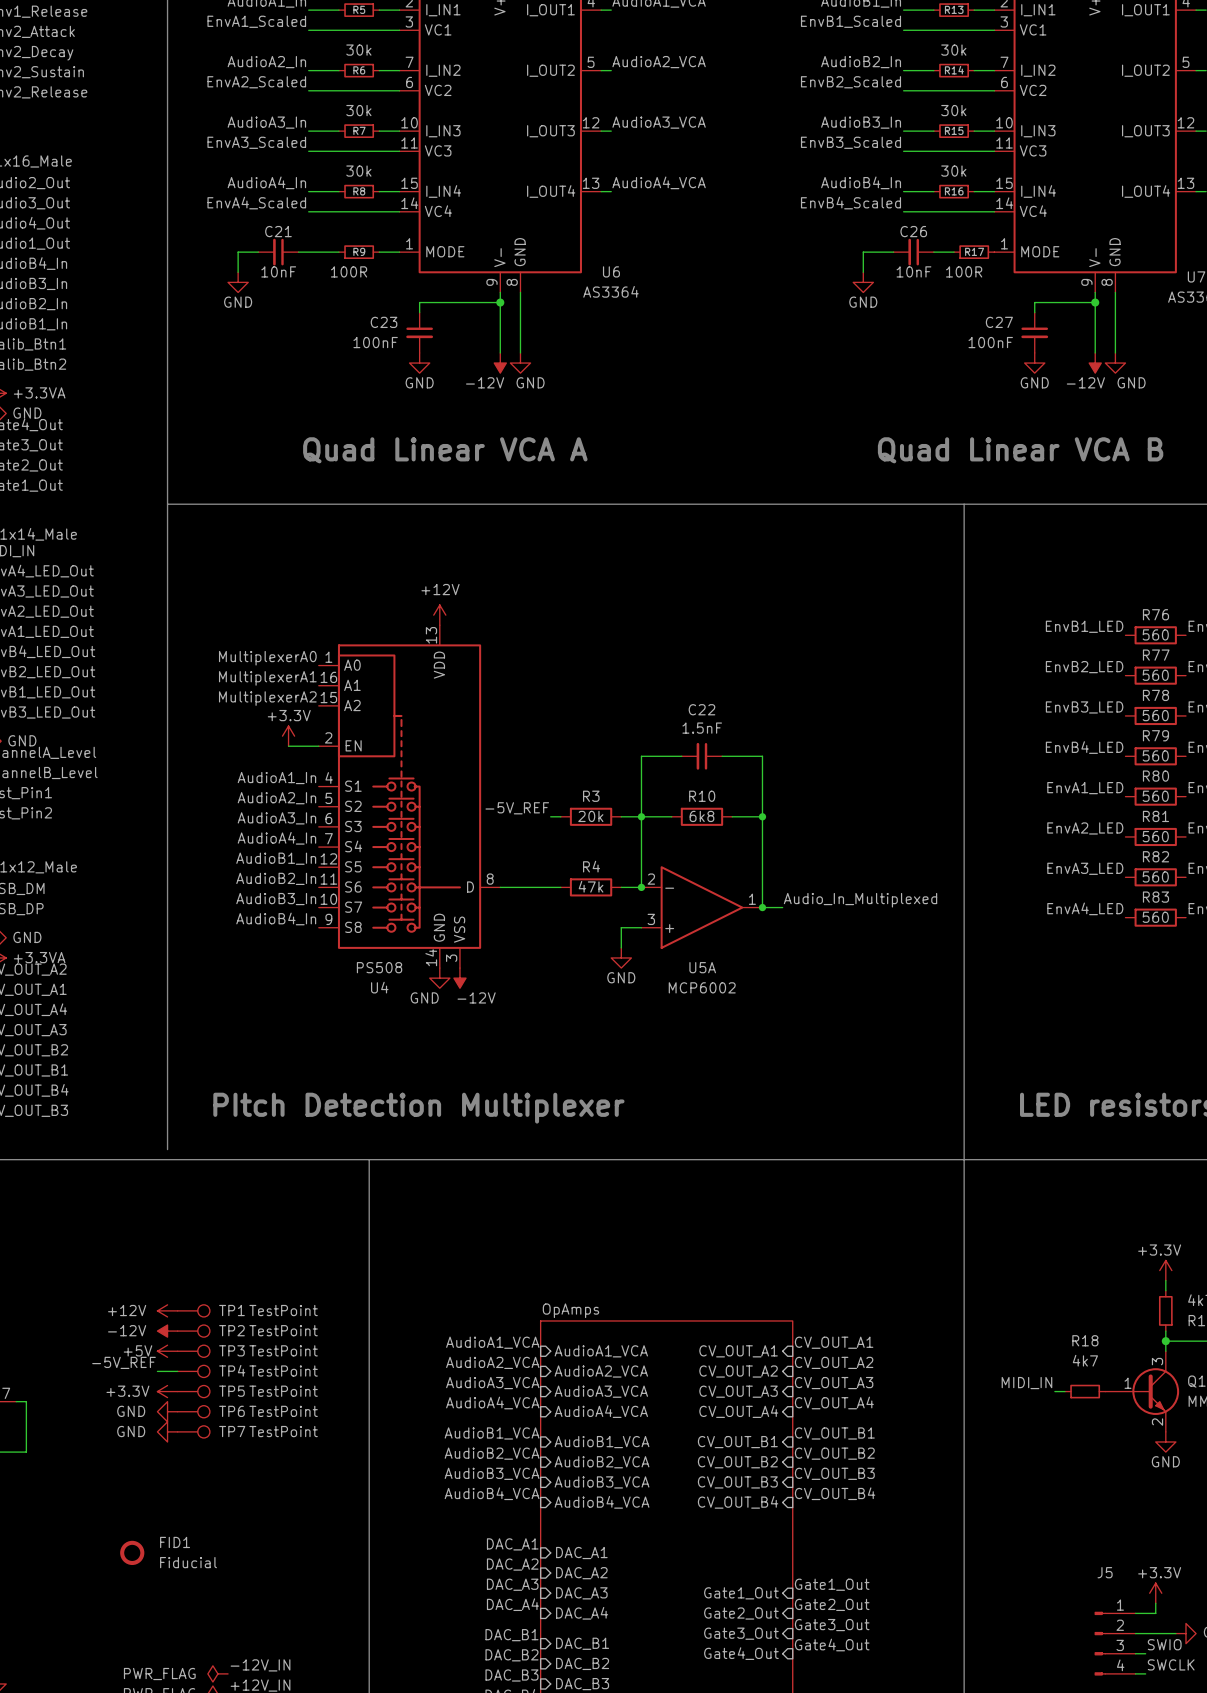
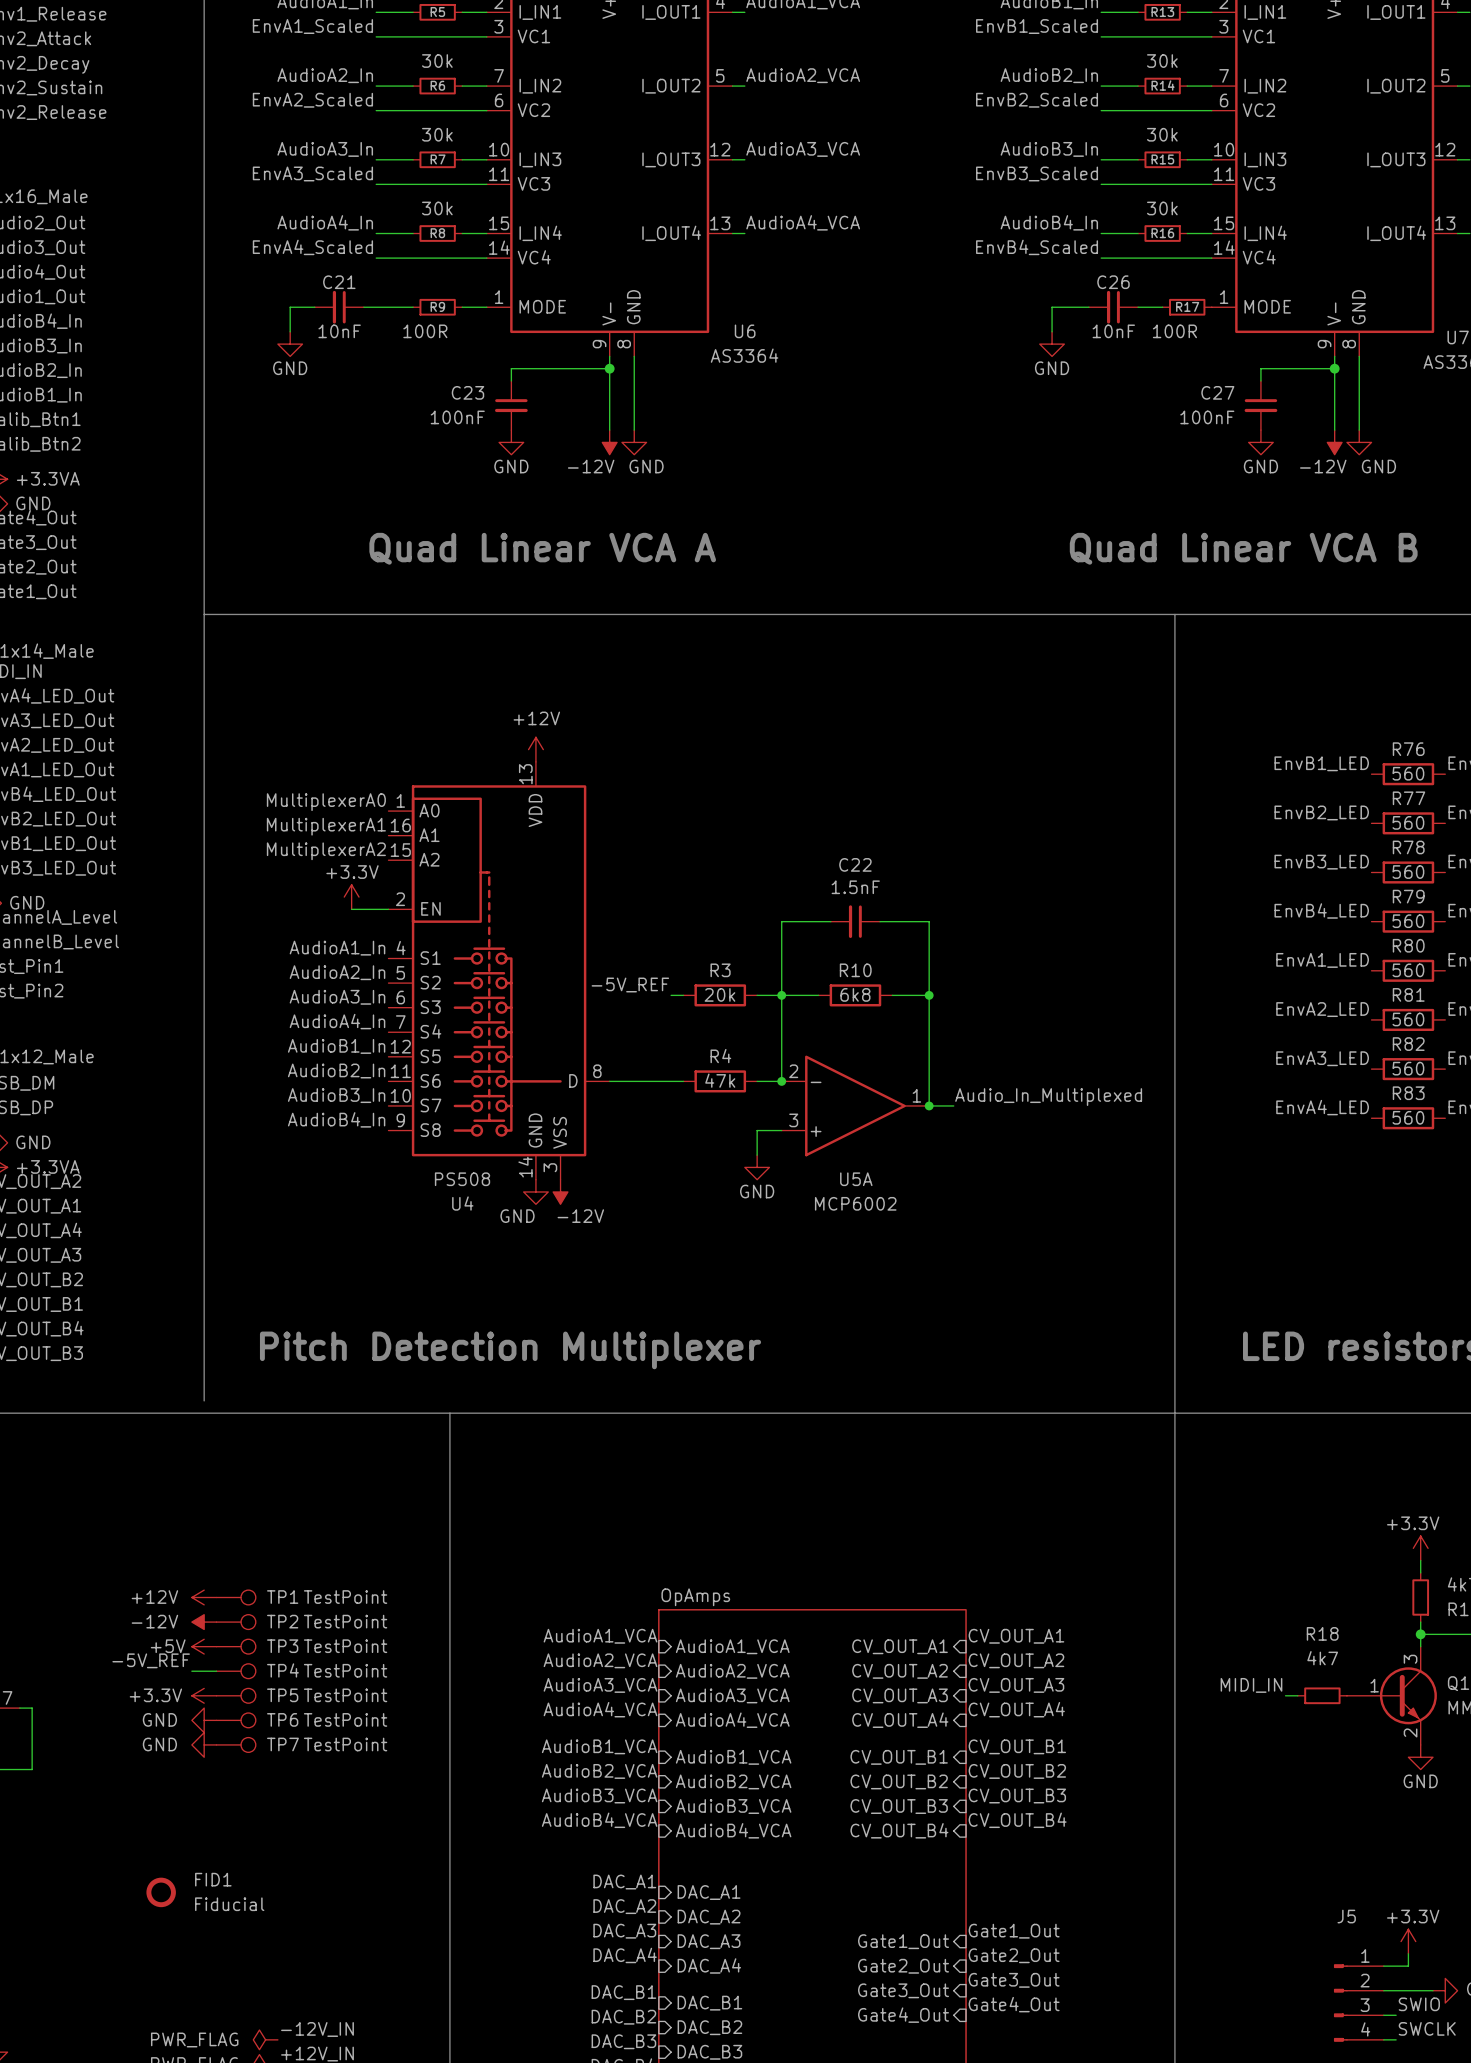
text: PItch Detection Multiplexer (418, 1108) -> Pitch Detection Multiplexer (510, 1350)

